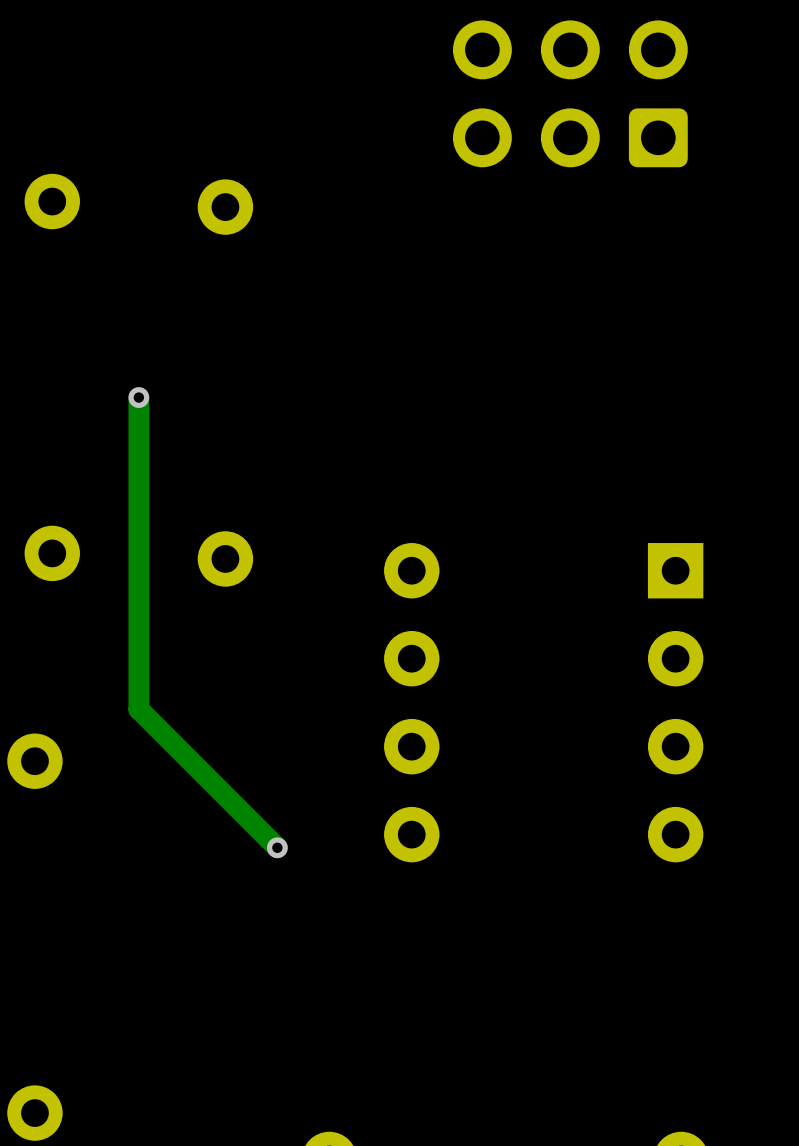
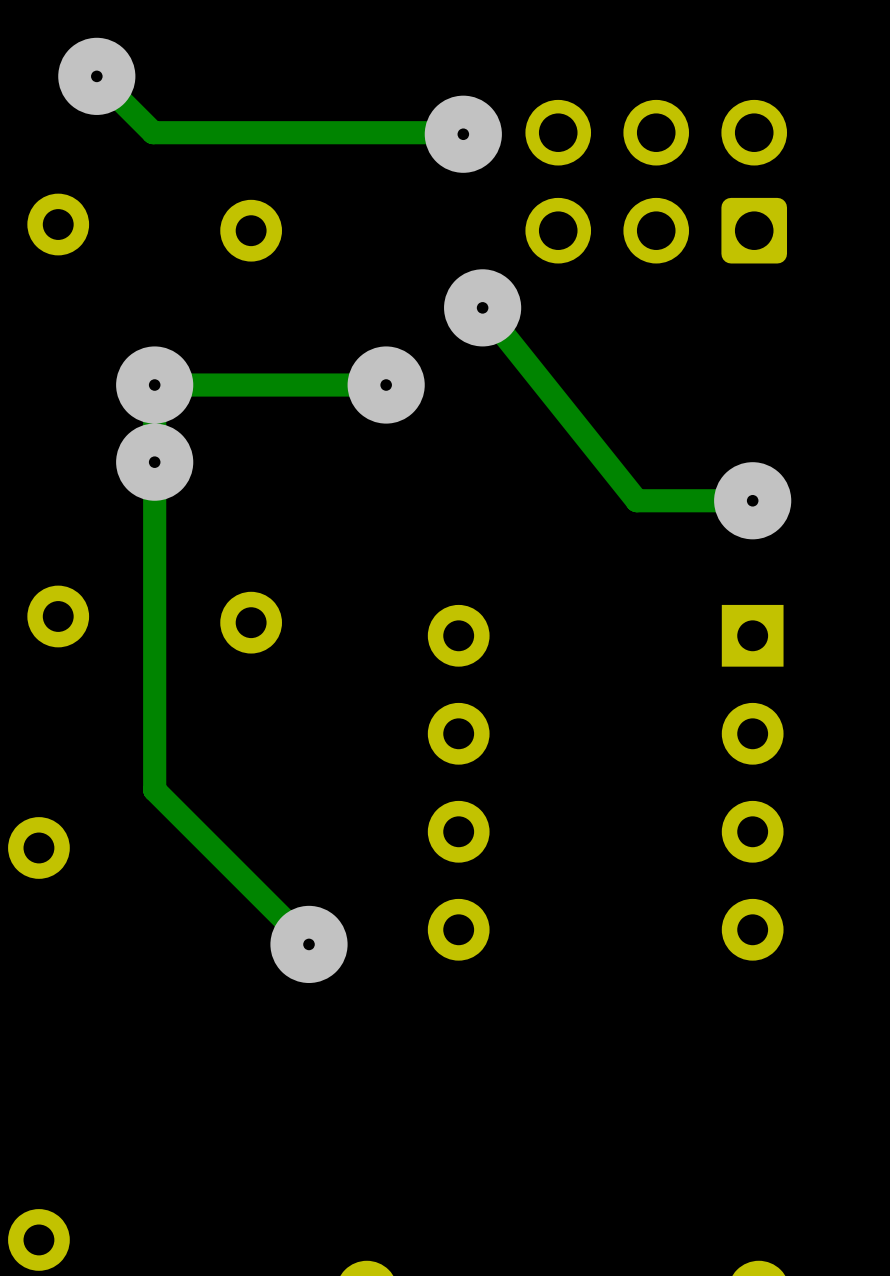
track: none -> (96, 76) (153, 132) (461, 132) (463, 134) (464, 132)
via: none -> (96, 76)
part position: (570, 93) -> (656, 181)
via: none -> (463, 134)
track: none -> (482, 307) (636, 500) (752, 500)
via: none -> (482, 307)
via: none -> (154, 385)
track: none -> (386, 385) (154, 385) (154, 442)
via: none -> (386, 385)
via size: [128, 387, 150, 408] -> [116, 423, 194, 501]
via: none -> (752, 500)
via size: [266, 837, 288, 859] -> [270, 905, 348, 984]

